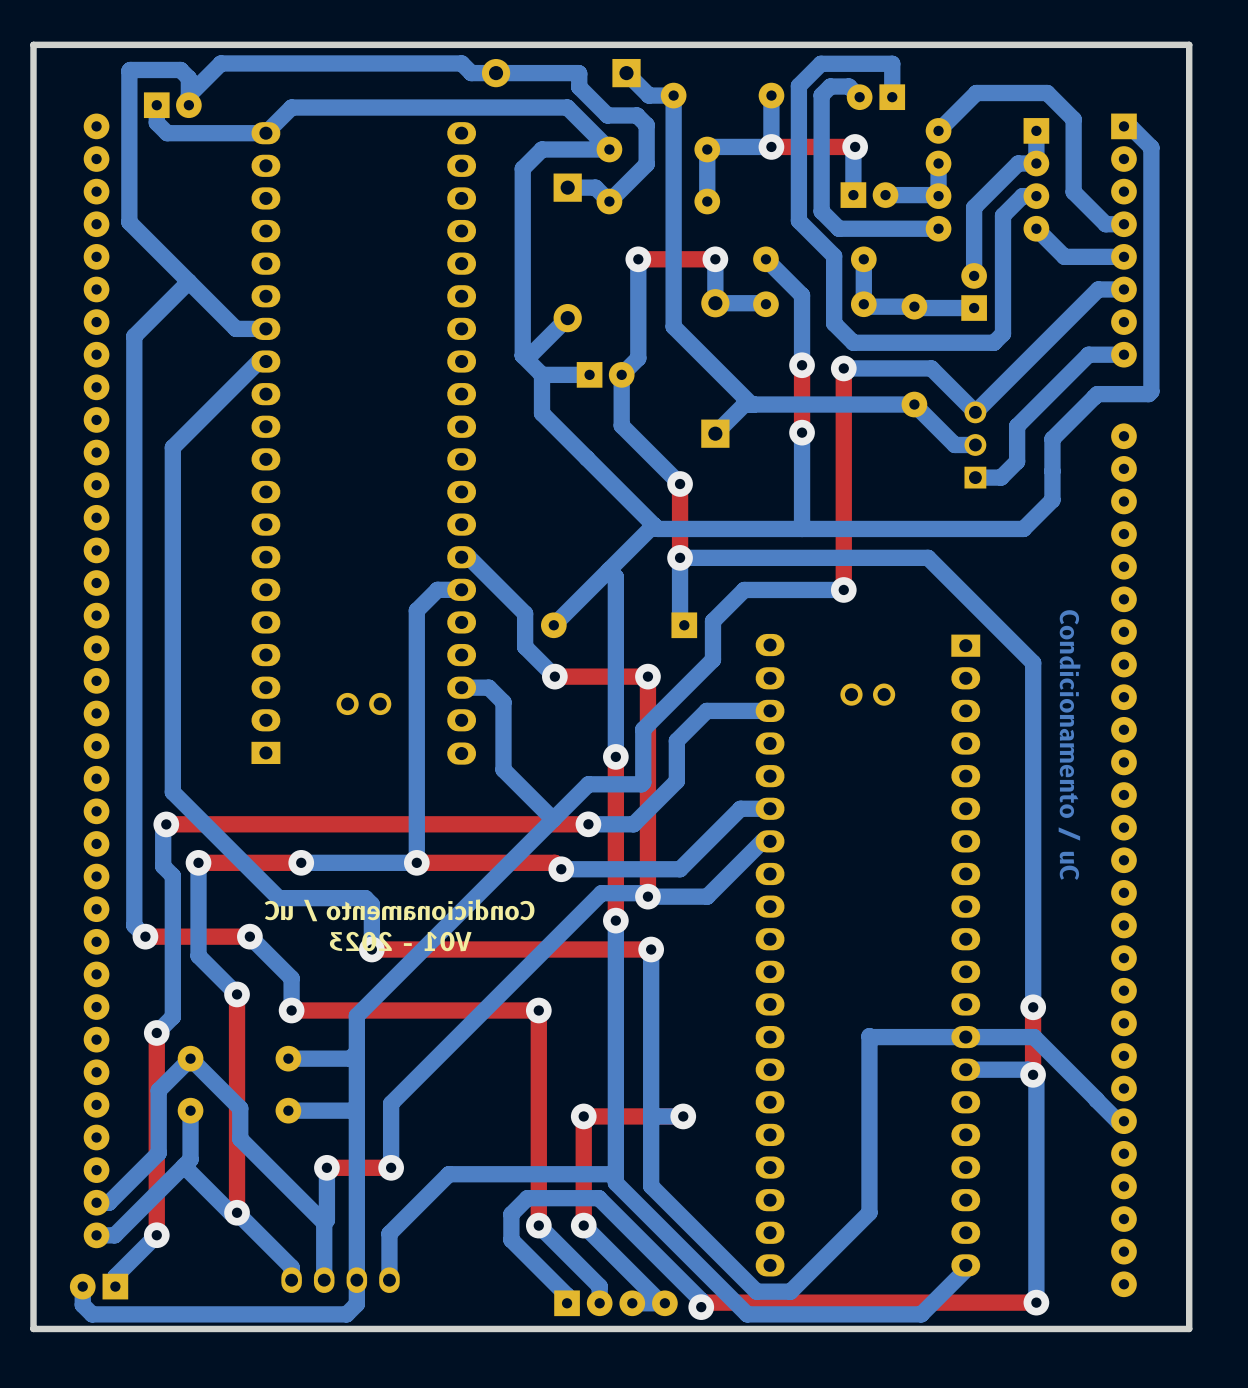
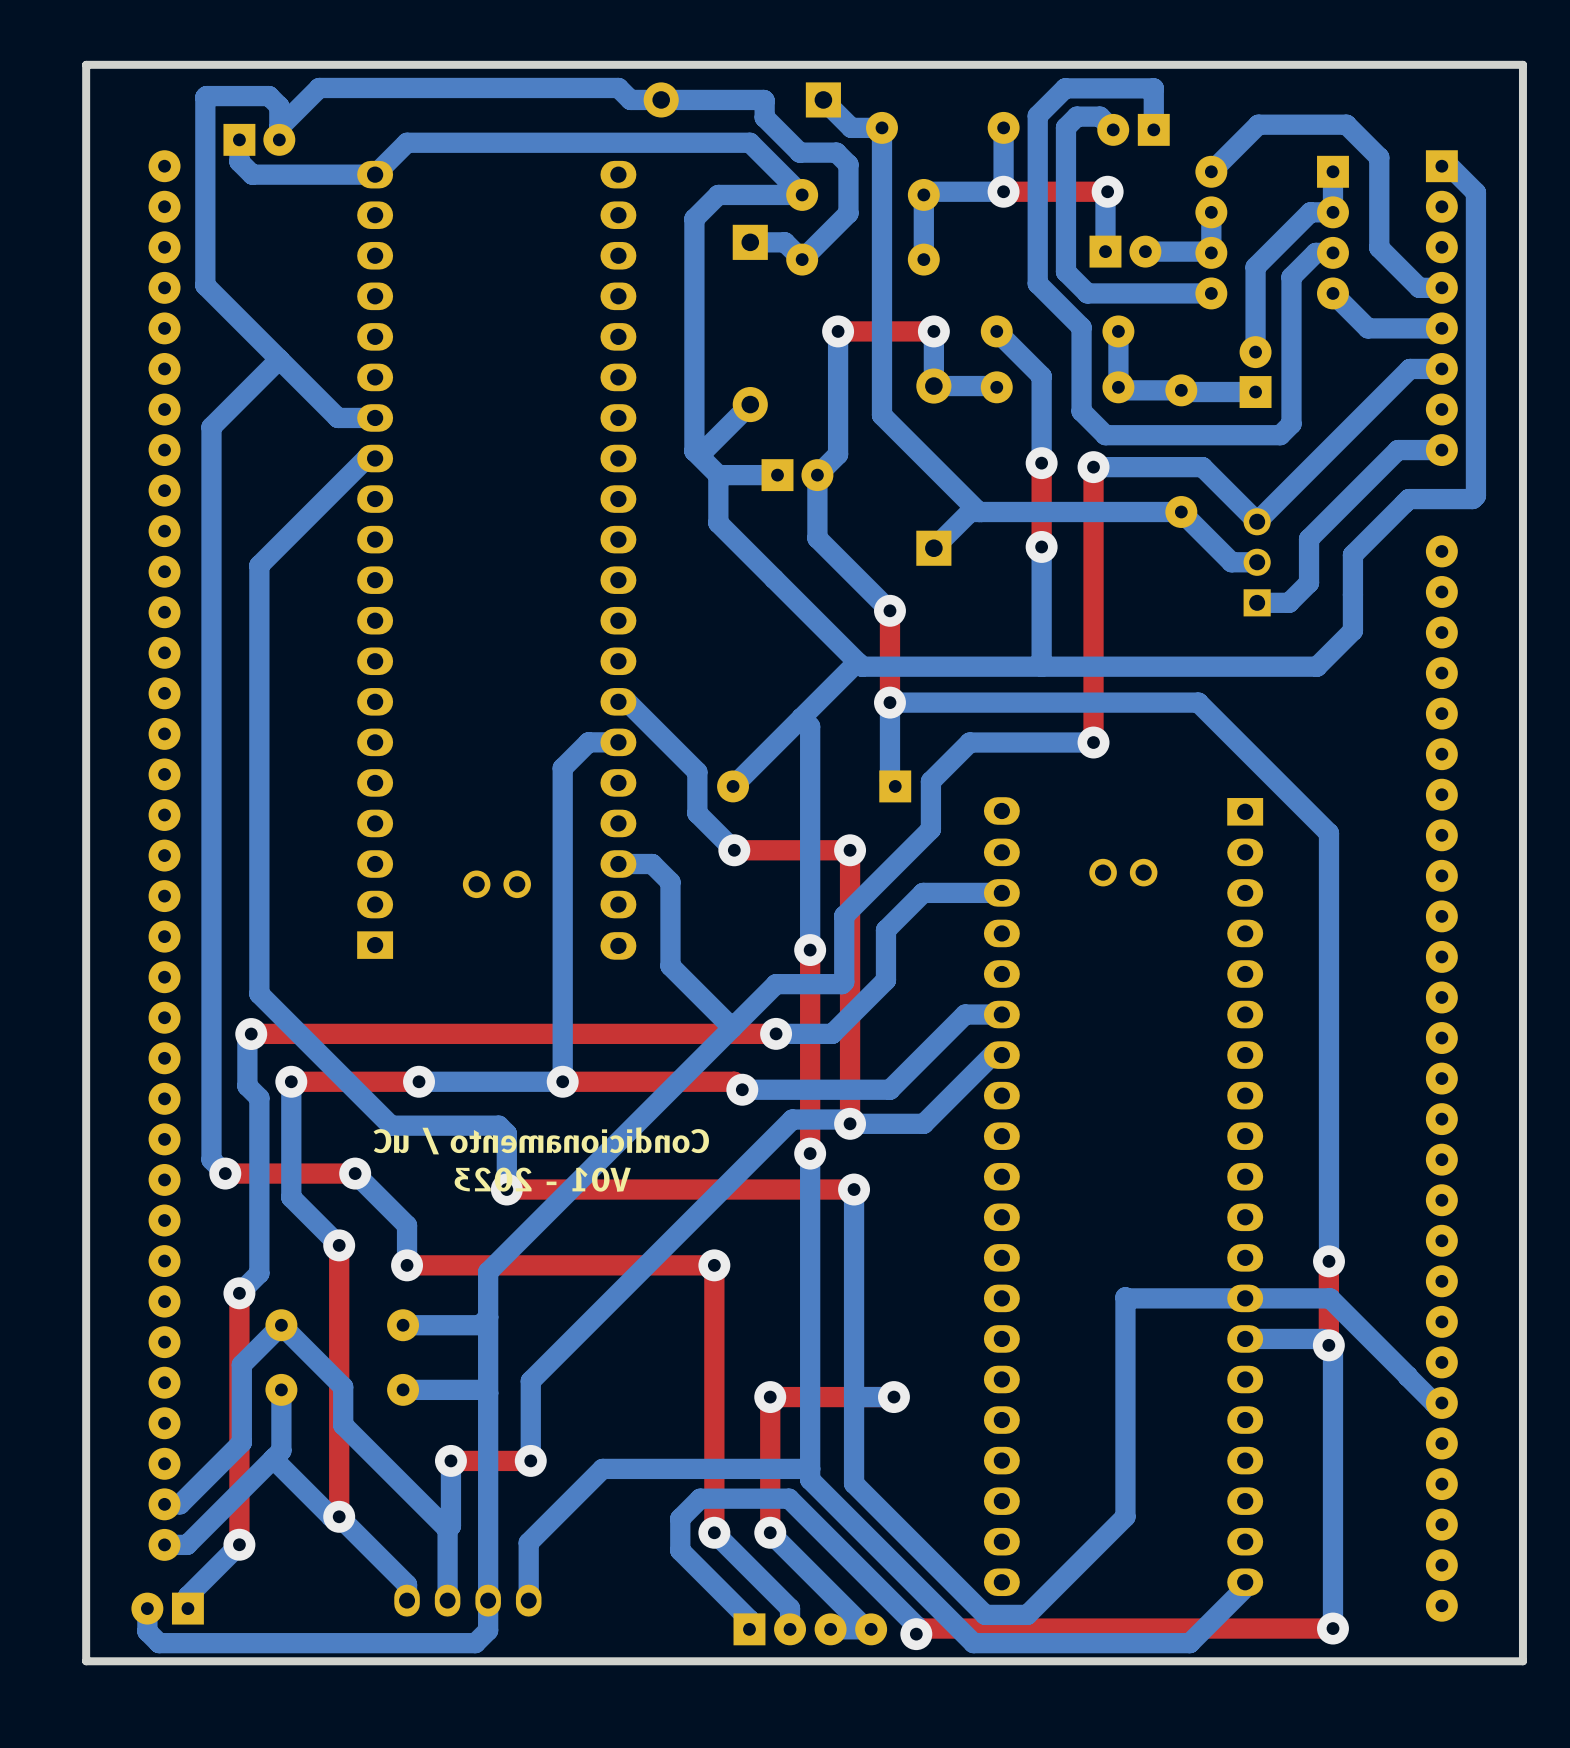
text: Condicionamento / uC (1069, 745) -> none

